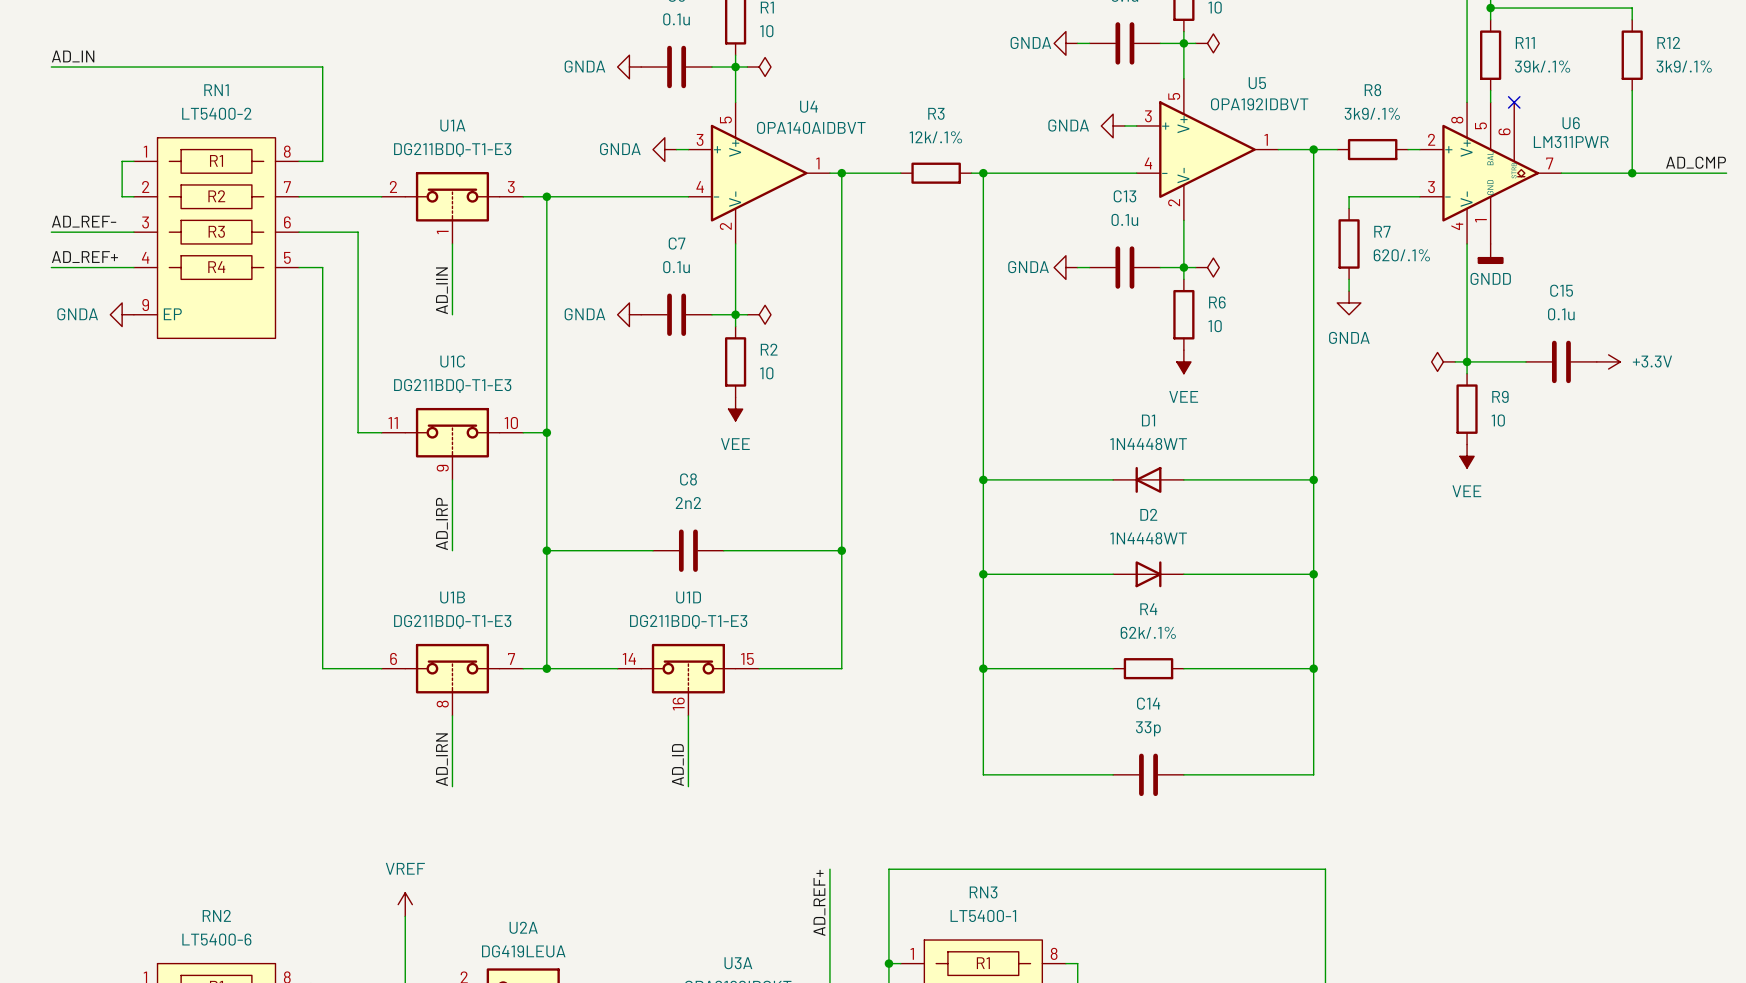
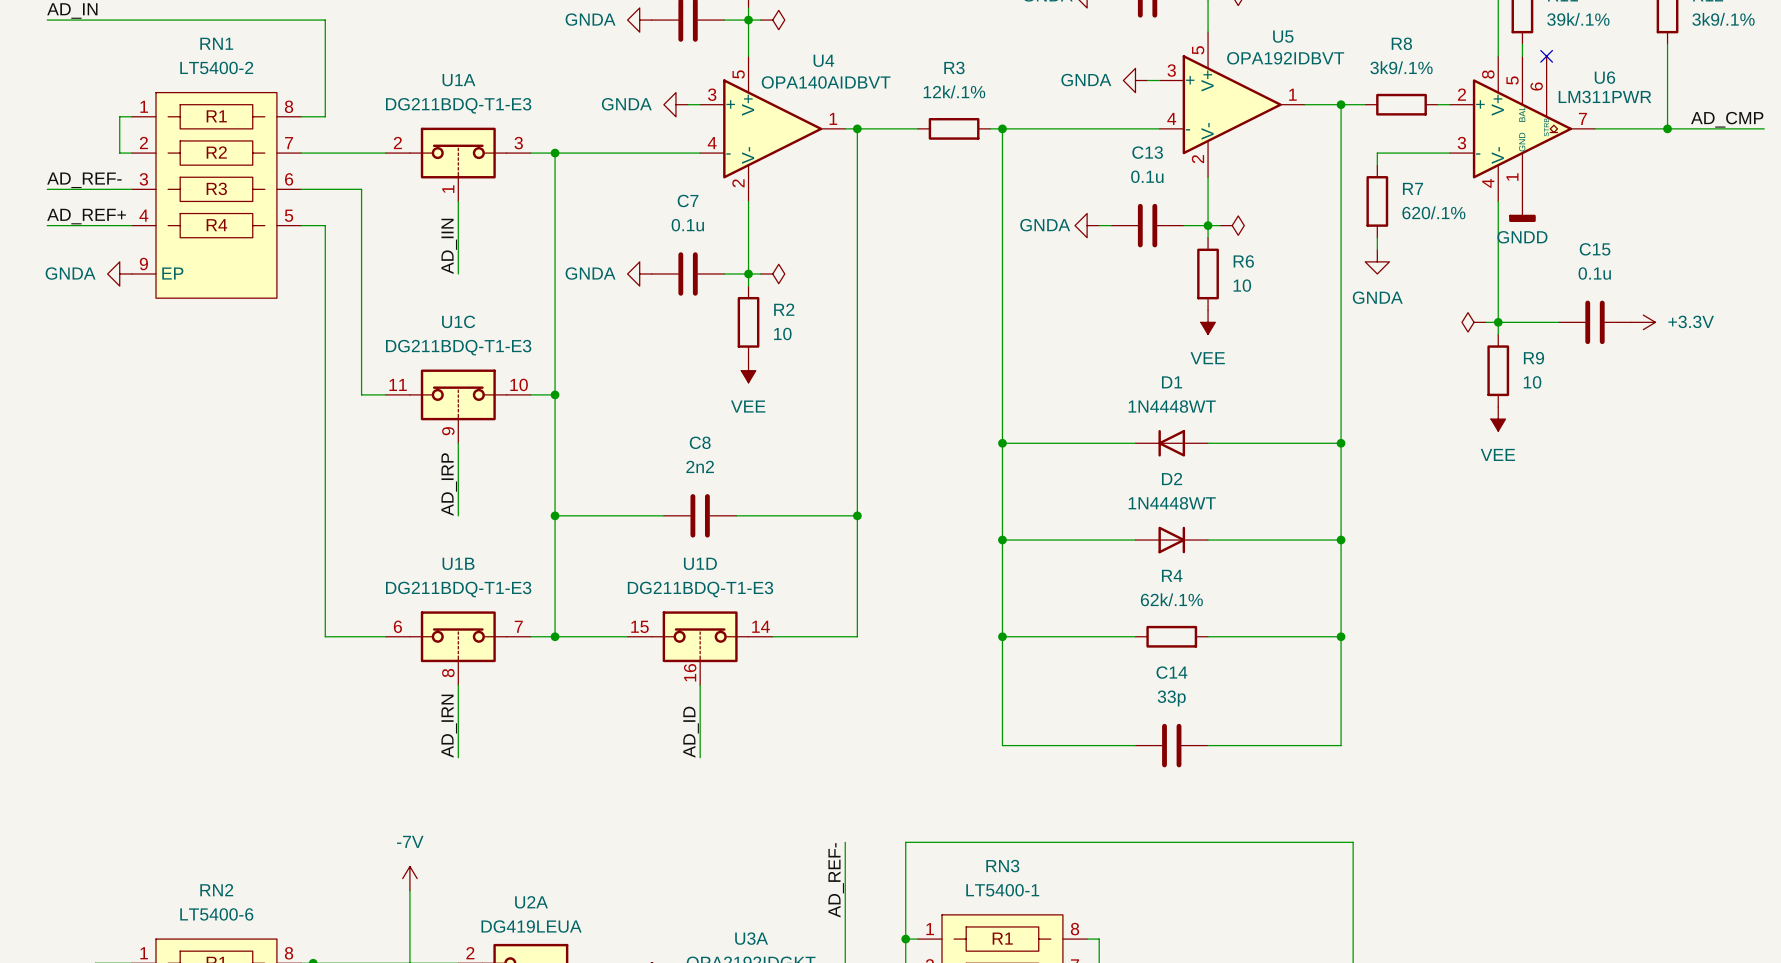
U1D flip: as is (688, 668) -> left-right (700, 636)
label: AD_REF+ (819, 902) -> AD_REF- (836, 880)
power symbol: VREF (405, 904) -> -7V (409, 878)

